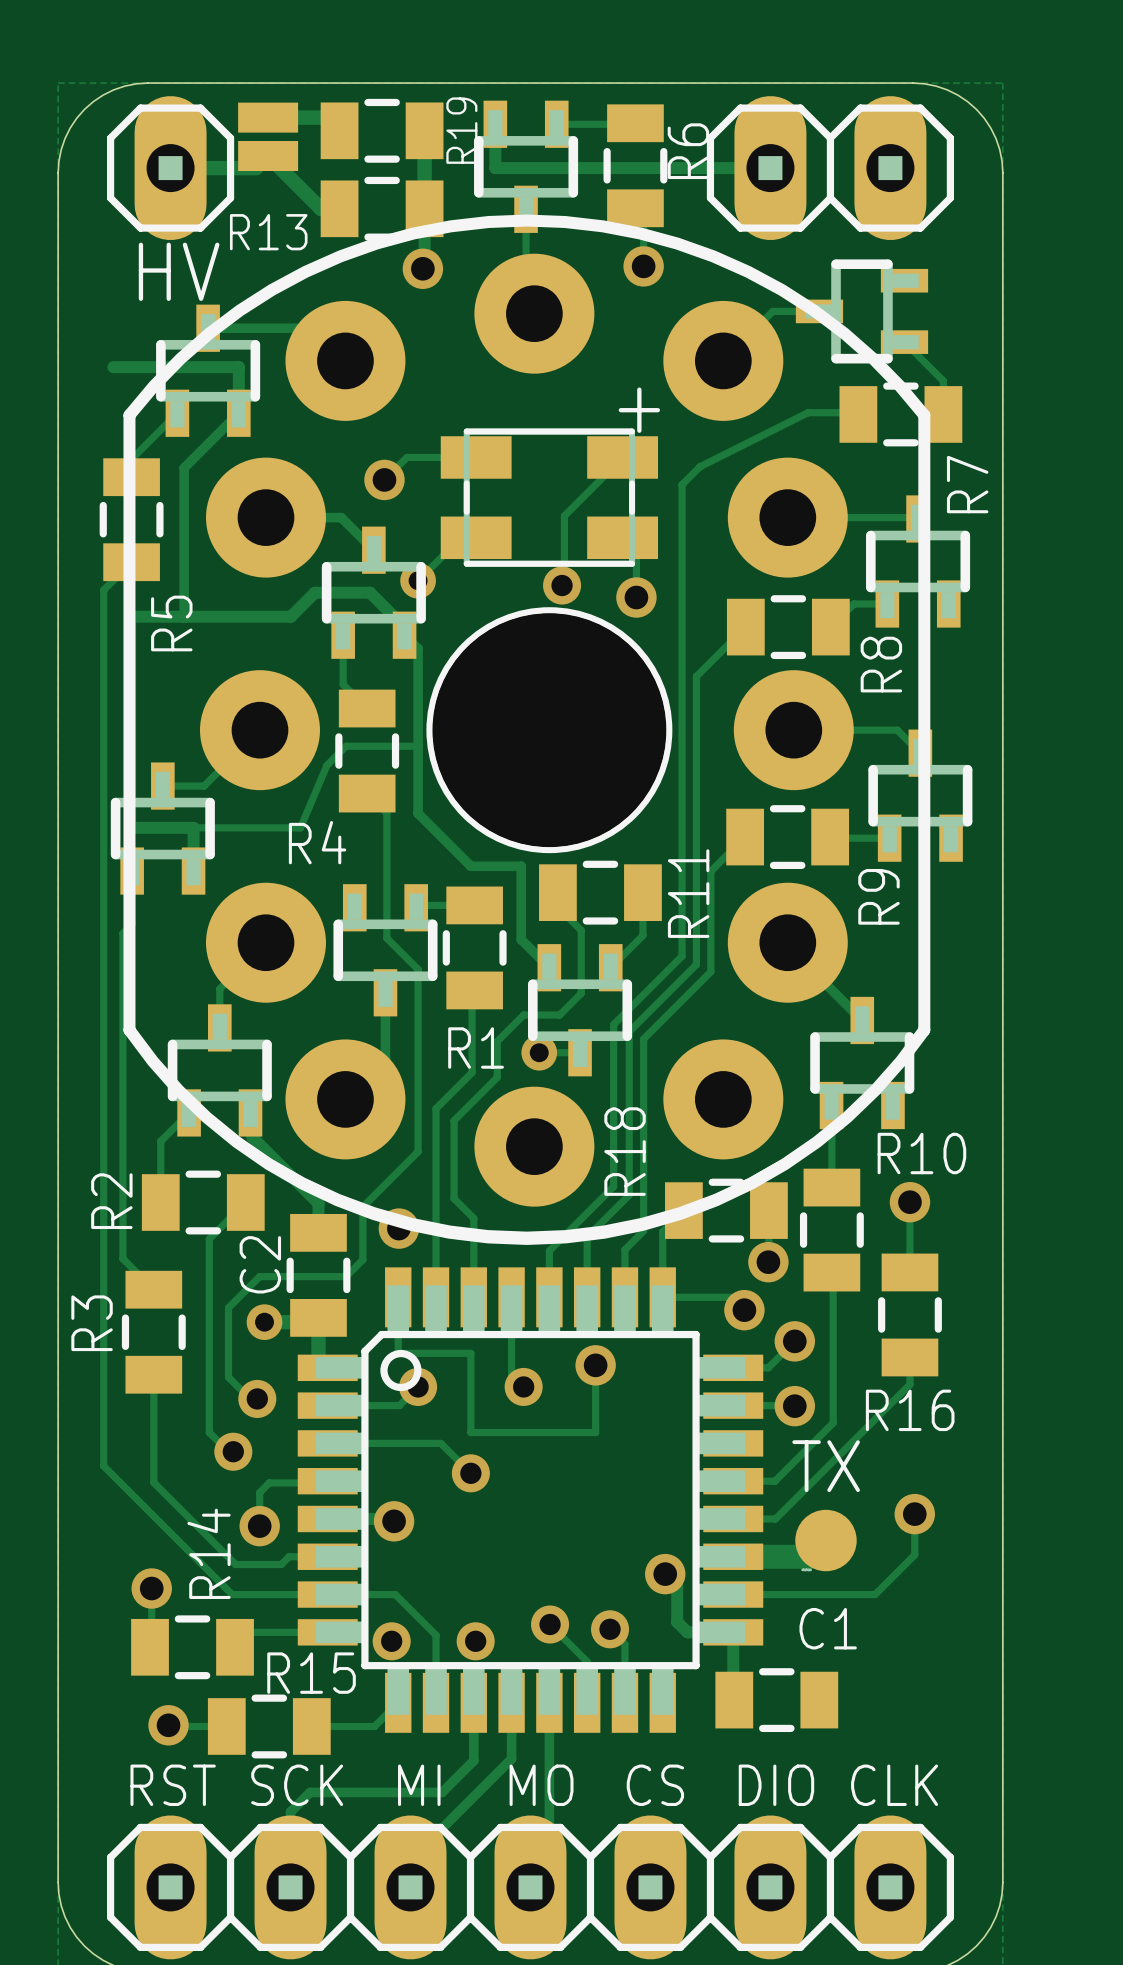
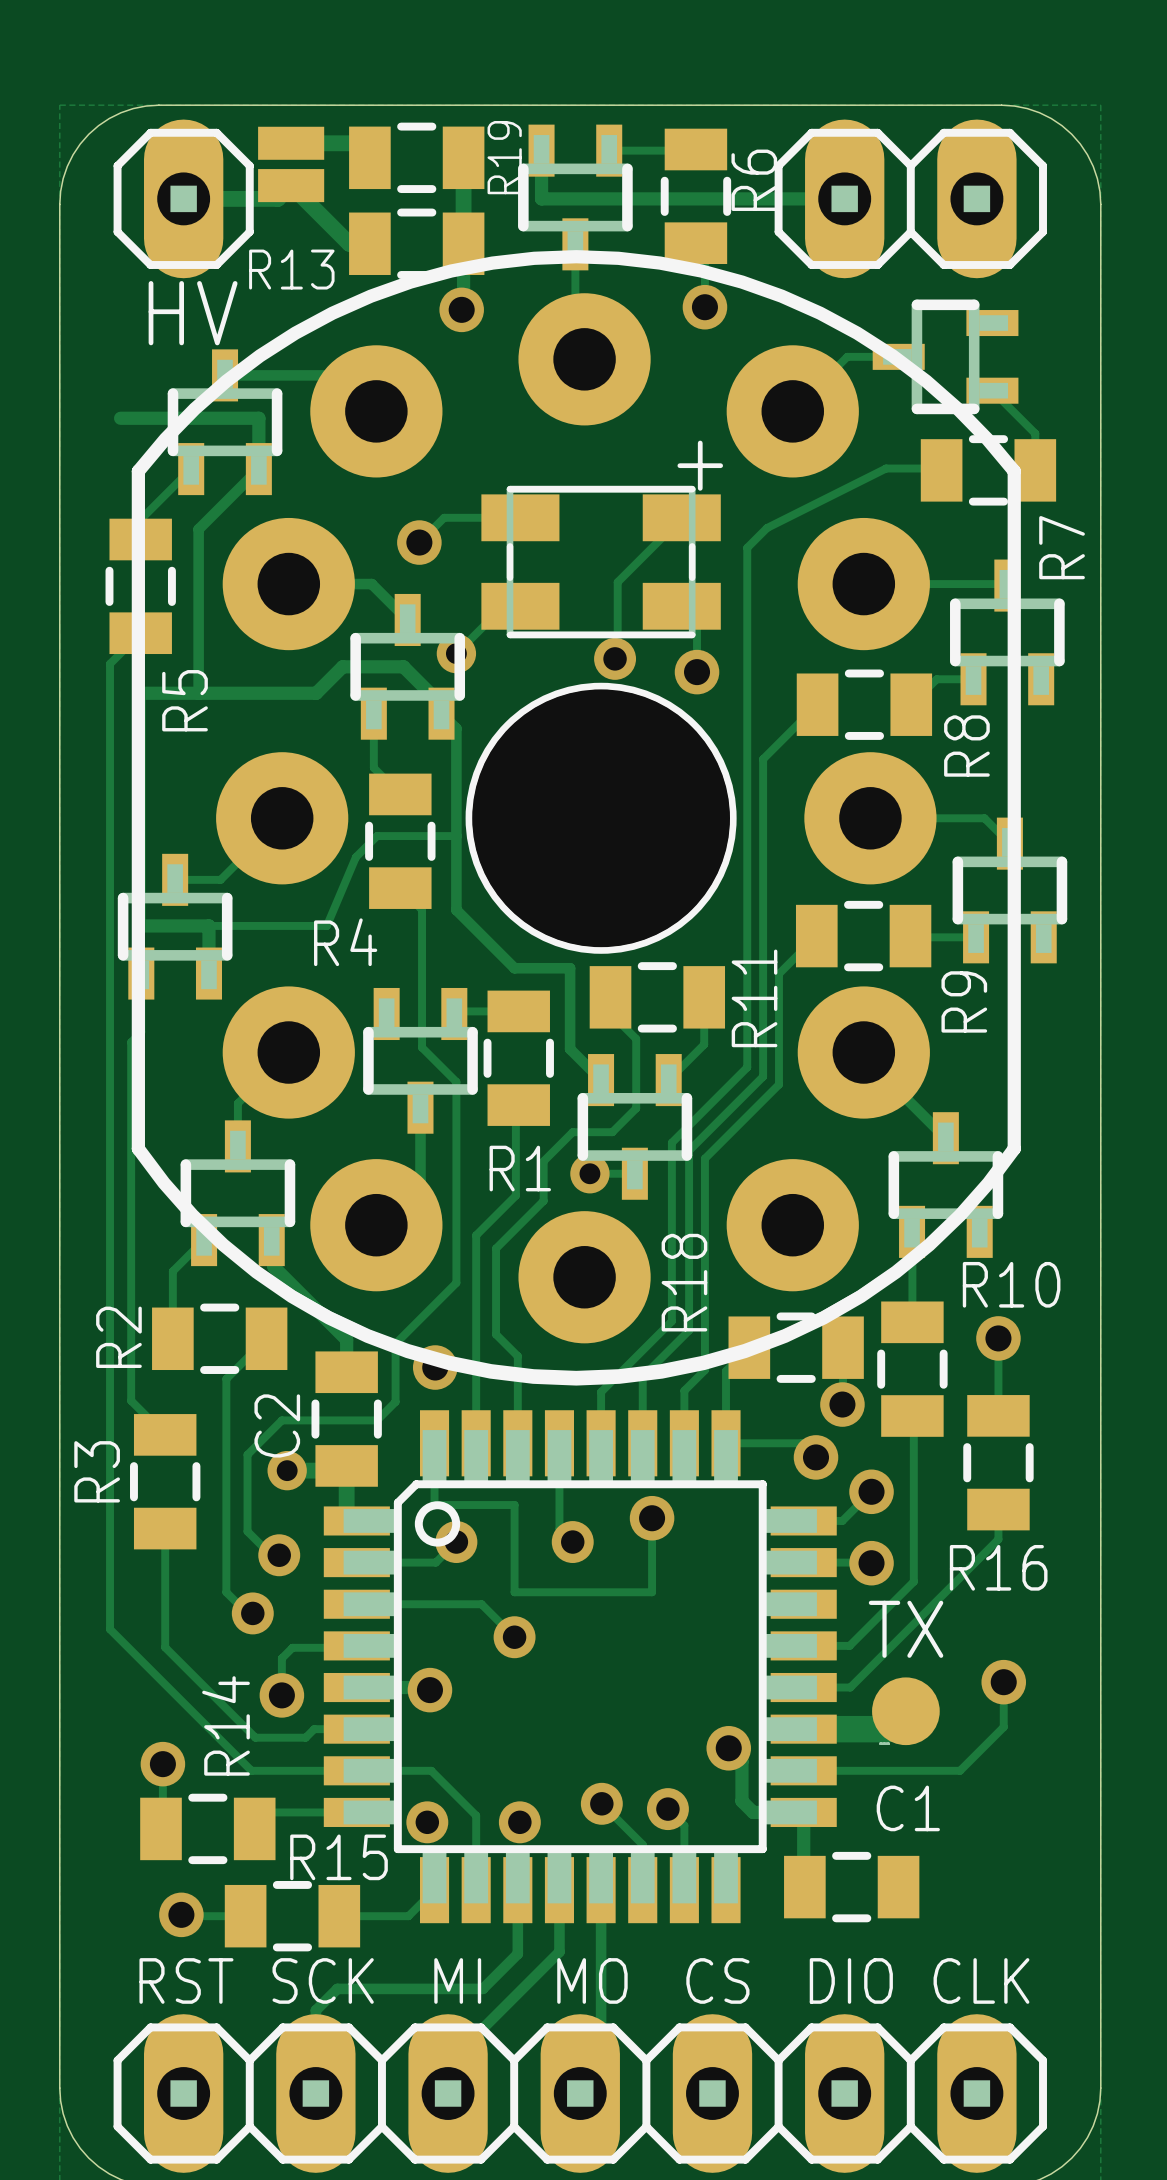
C2 name position: C2 (260, 1264) -> C2 (277, 1425)

